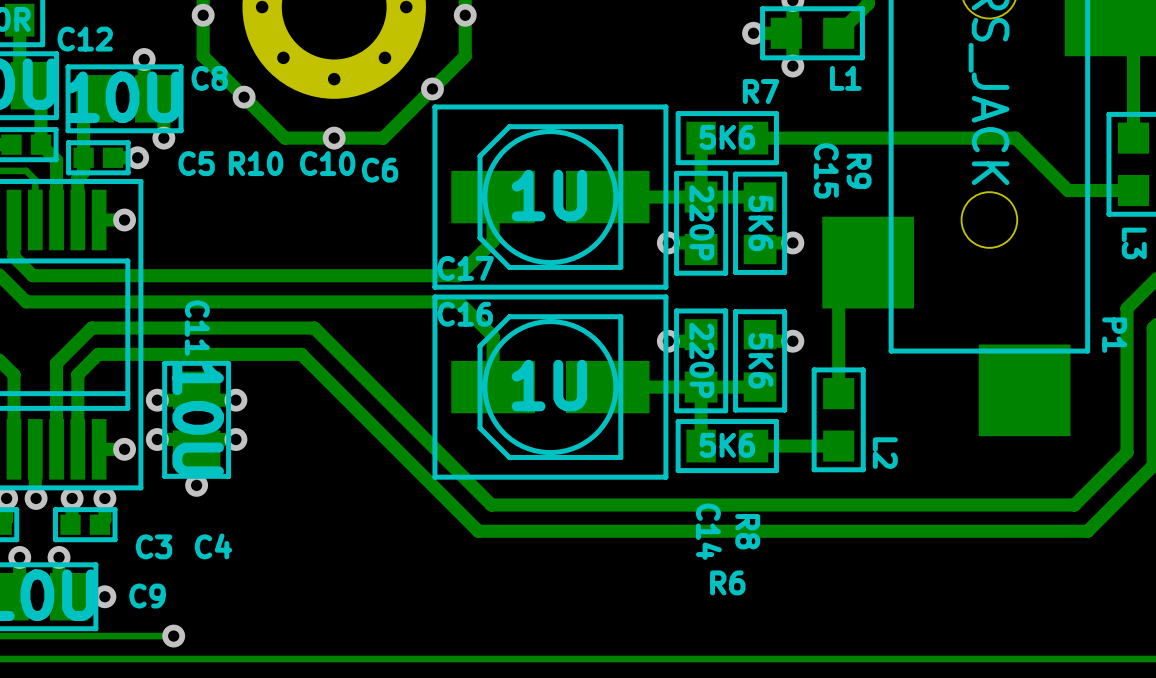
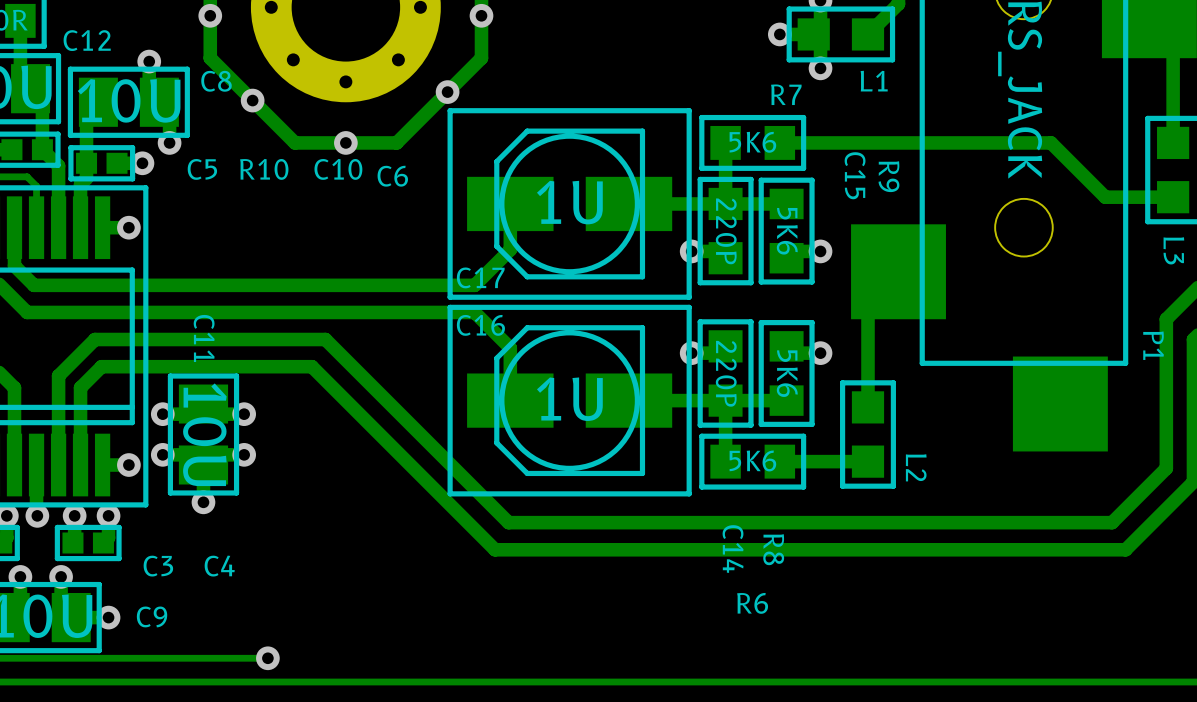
via position: (173, 636) -> (267, 658)
track: none -> (267, 658) (179, 658)

